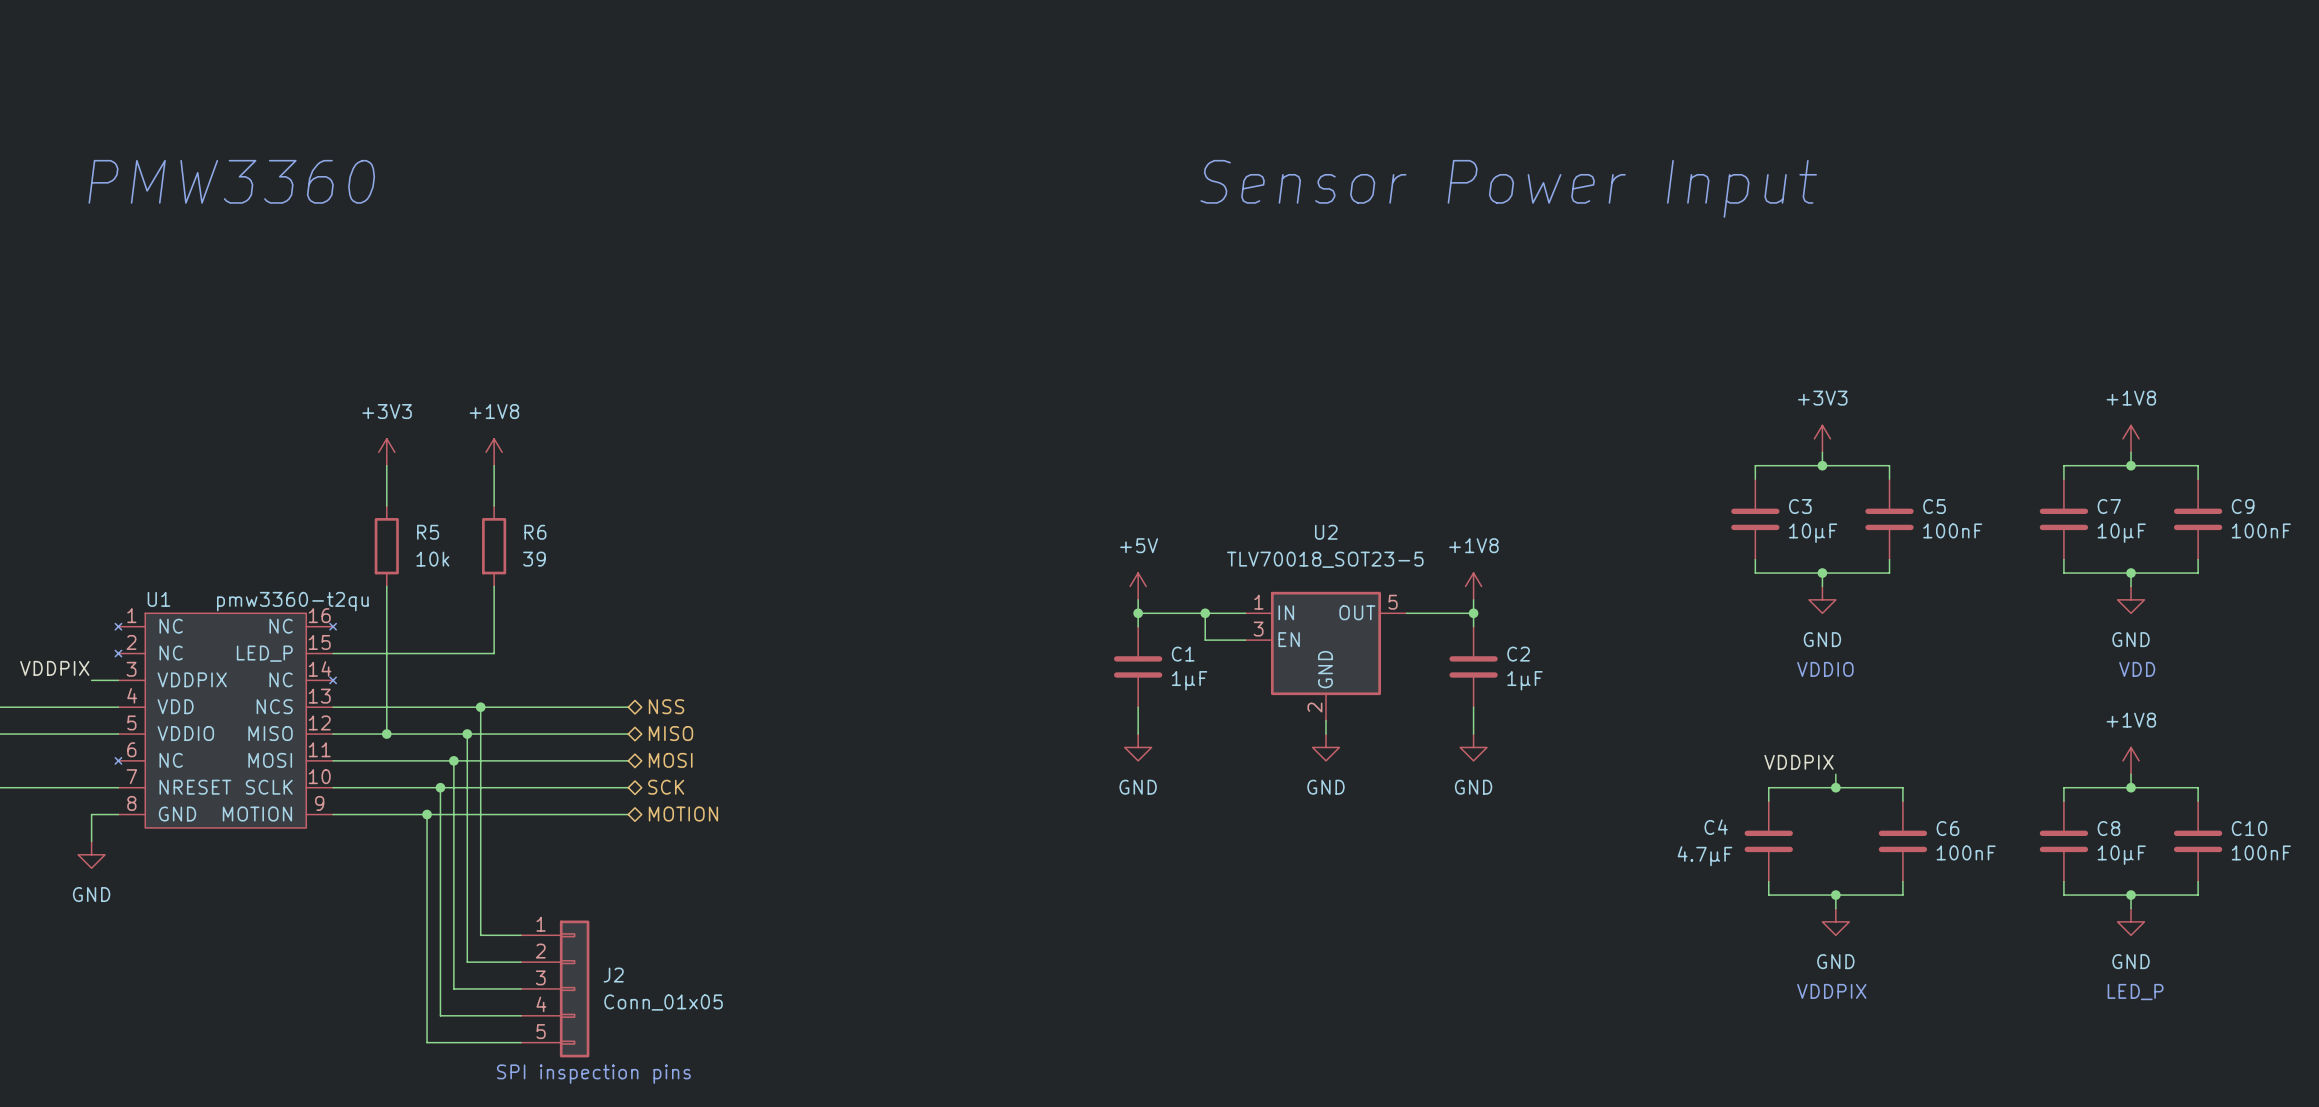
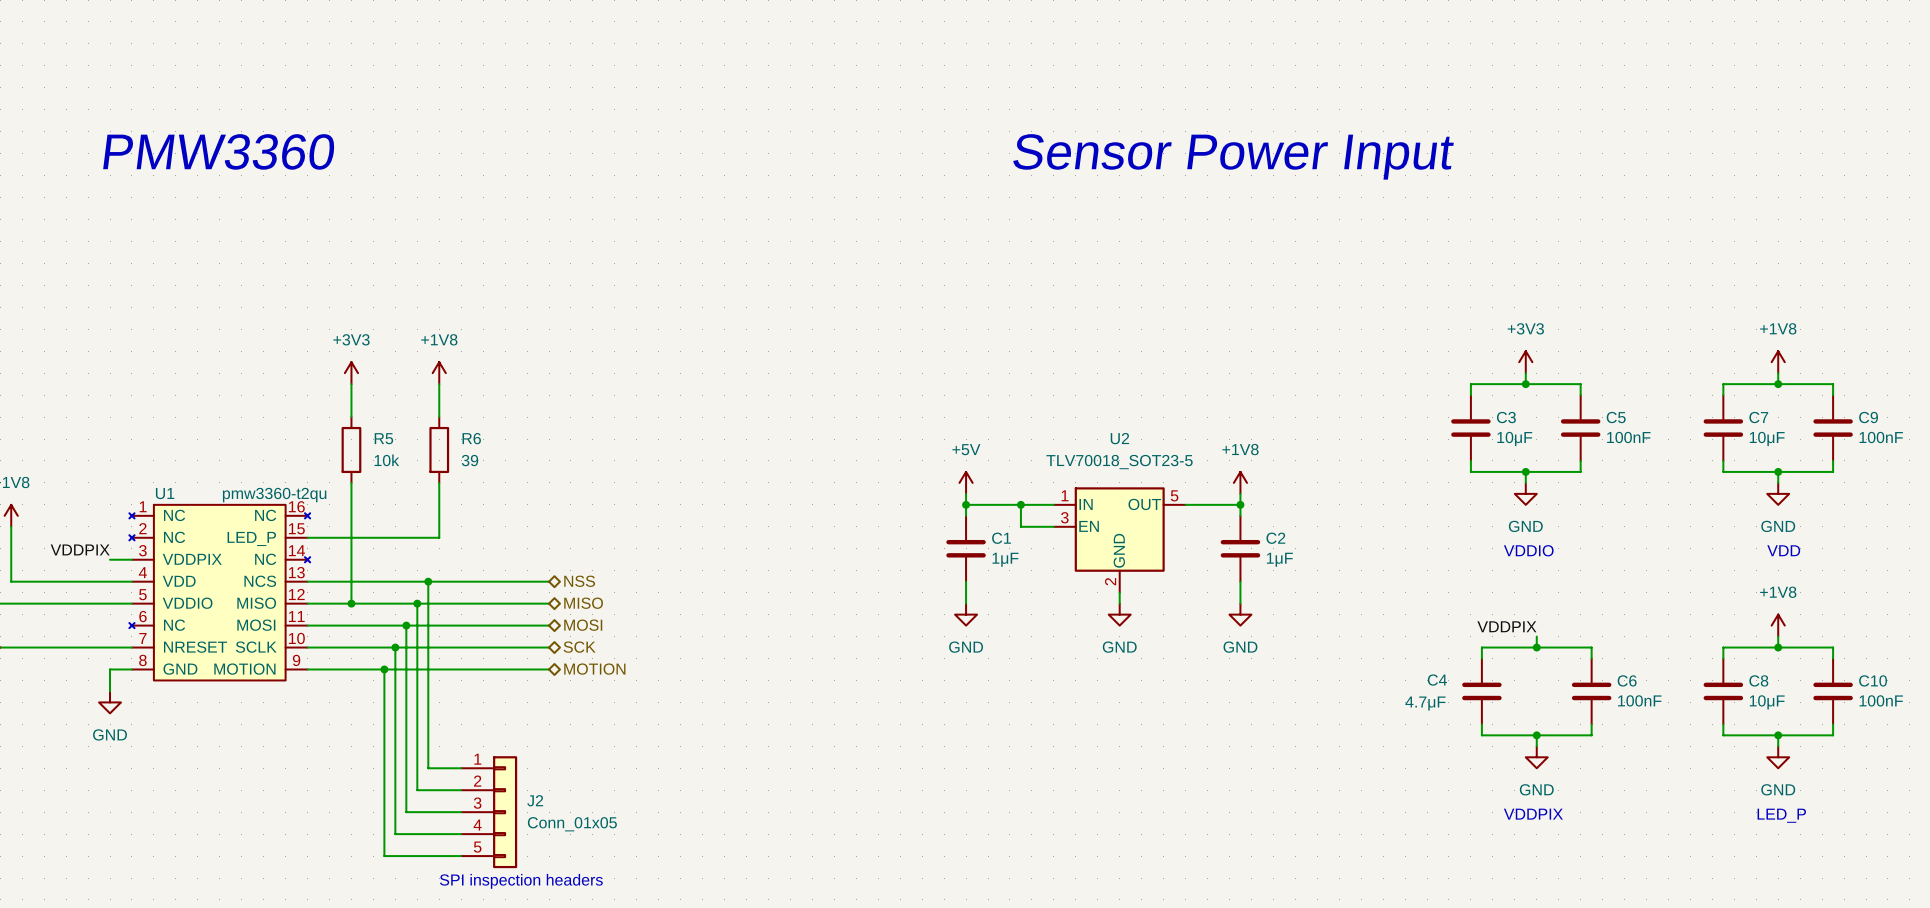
text: SPI inspection pins (593, 1074) -> SPI inspection headers (521, 881)

